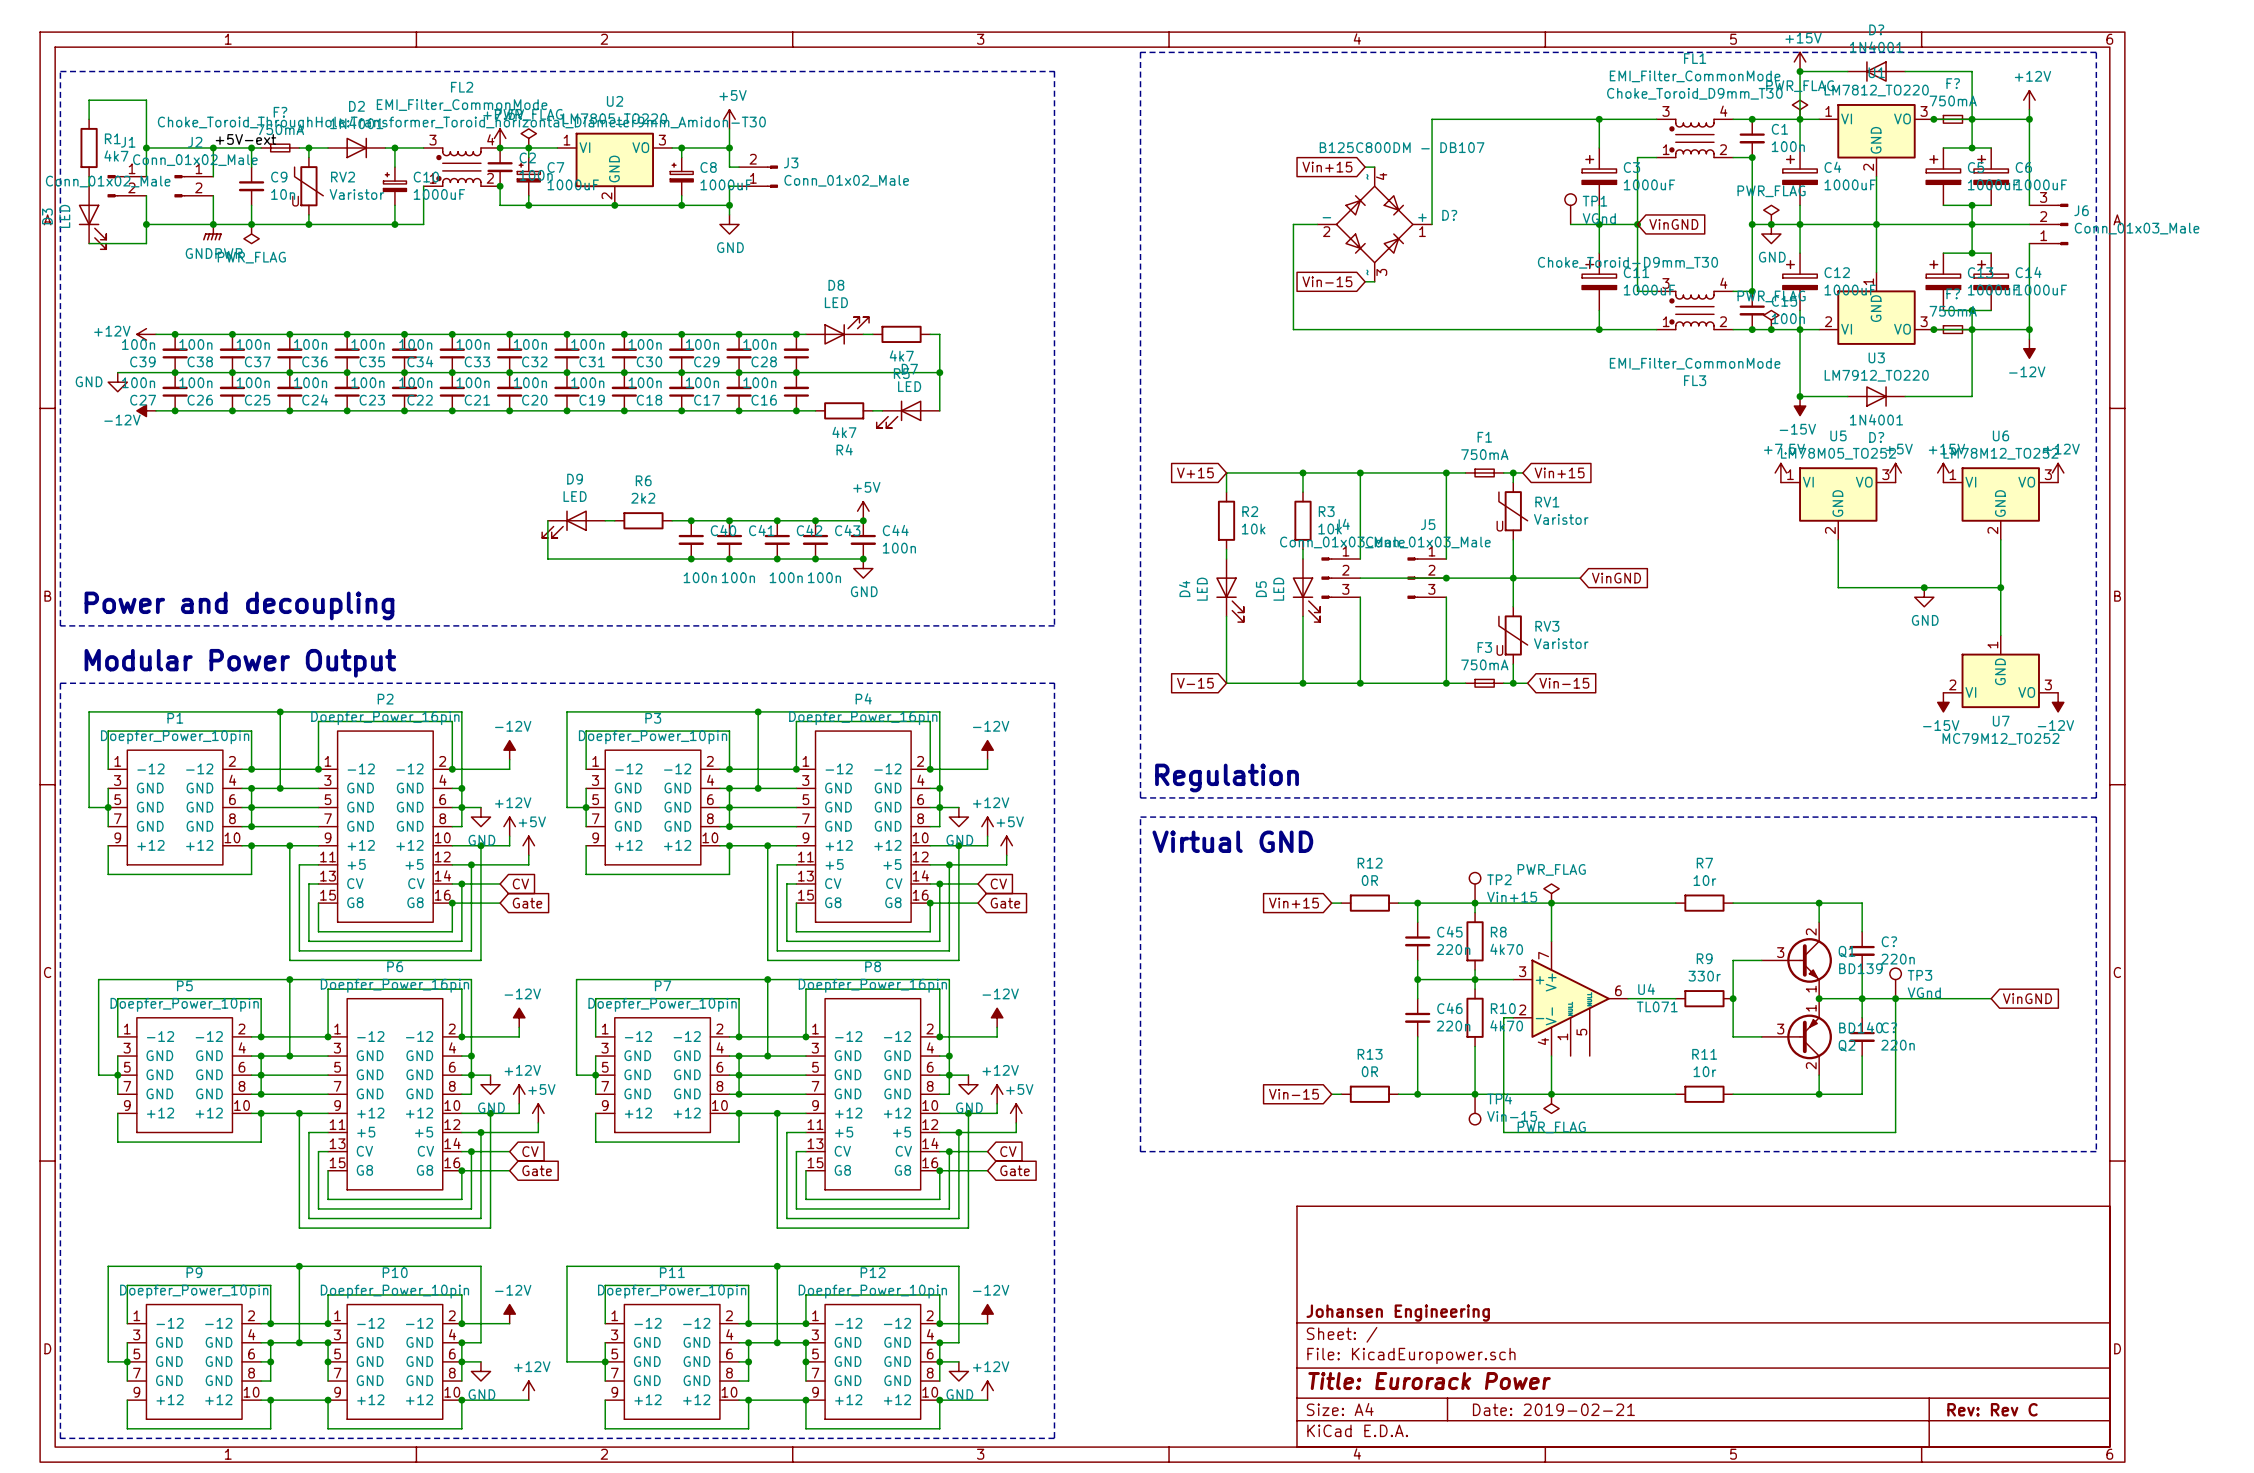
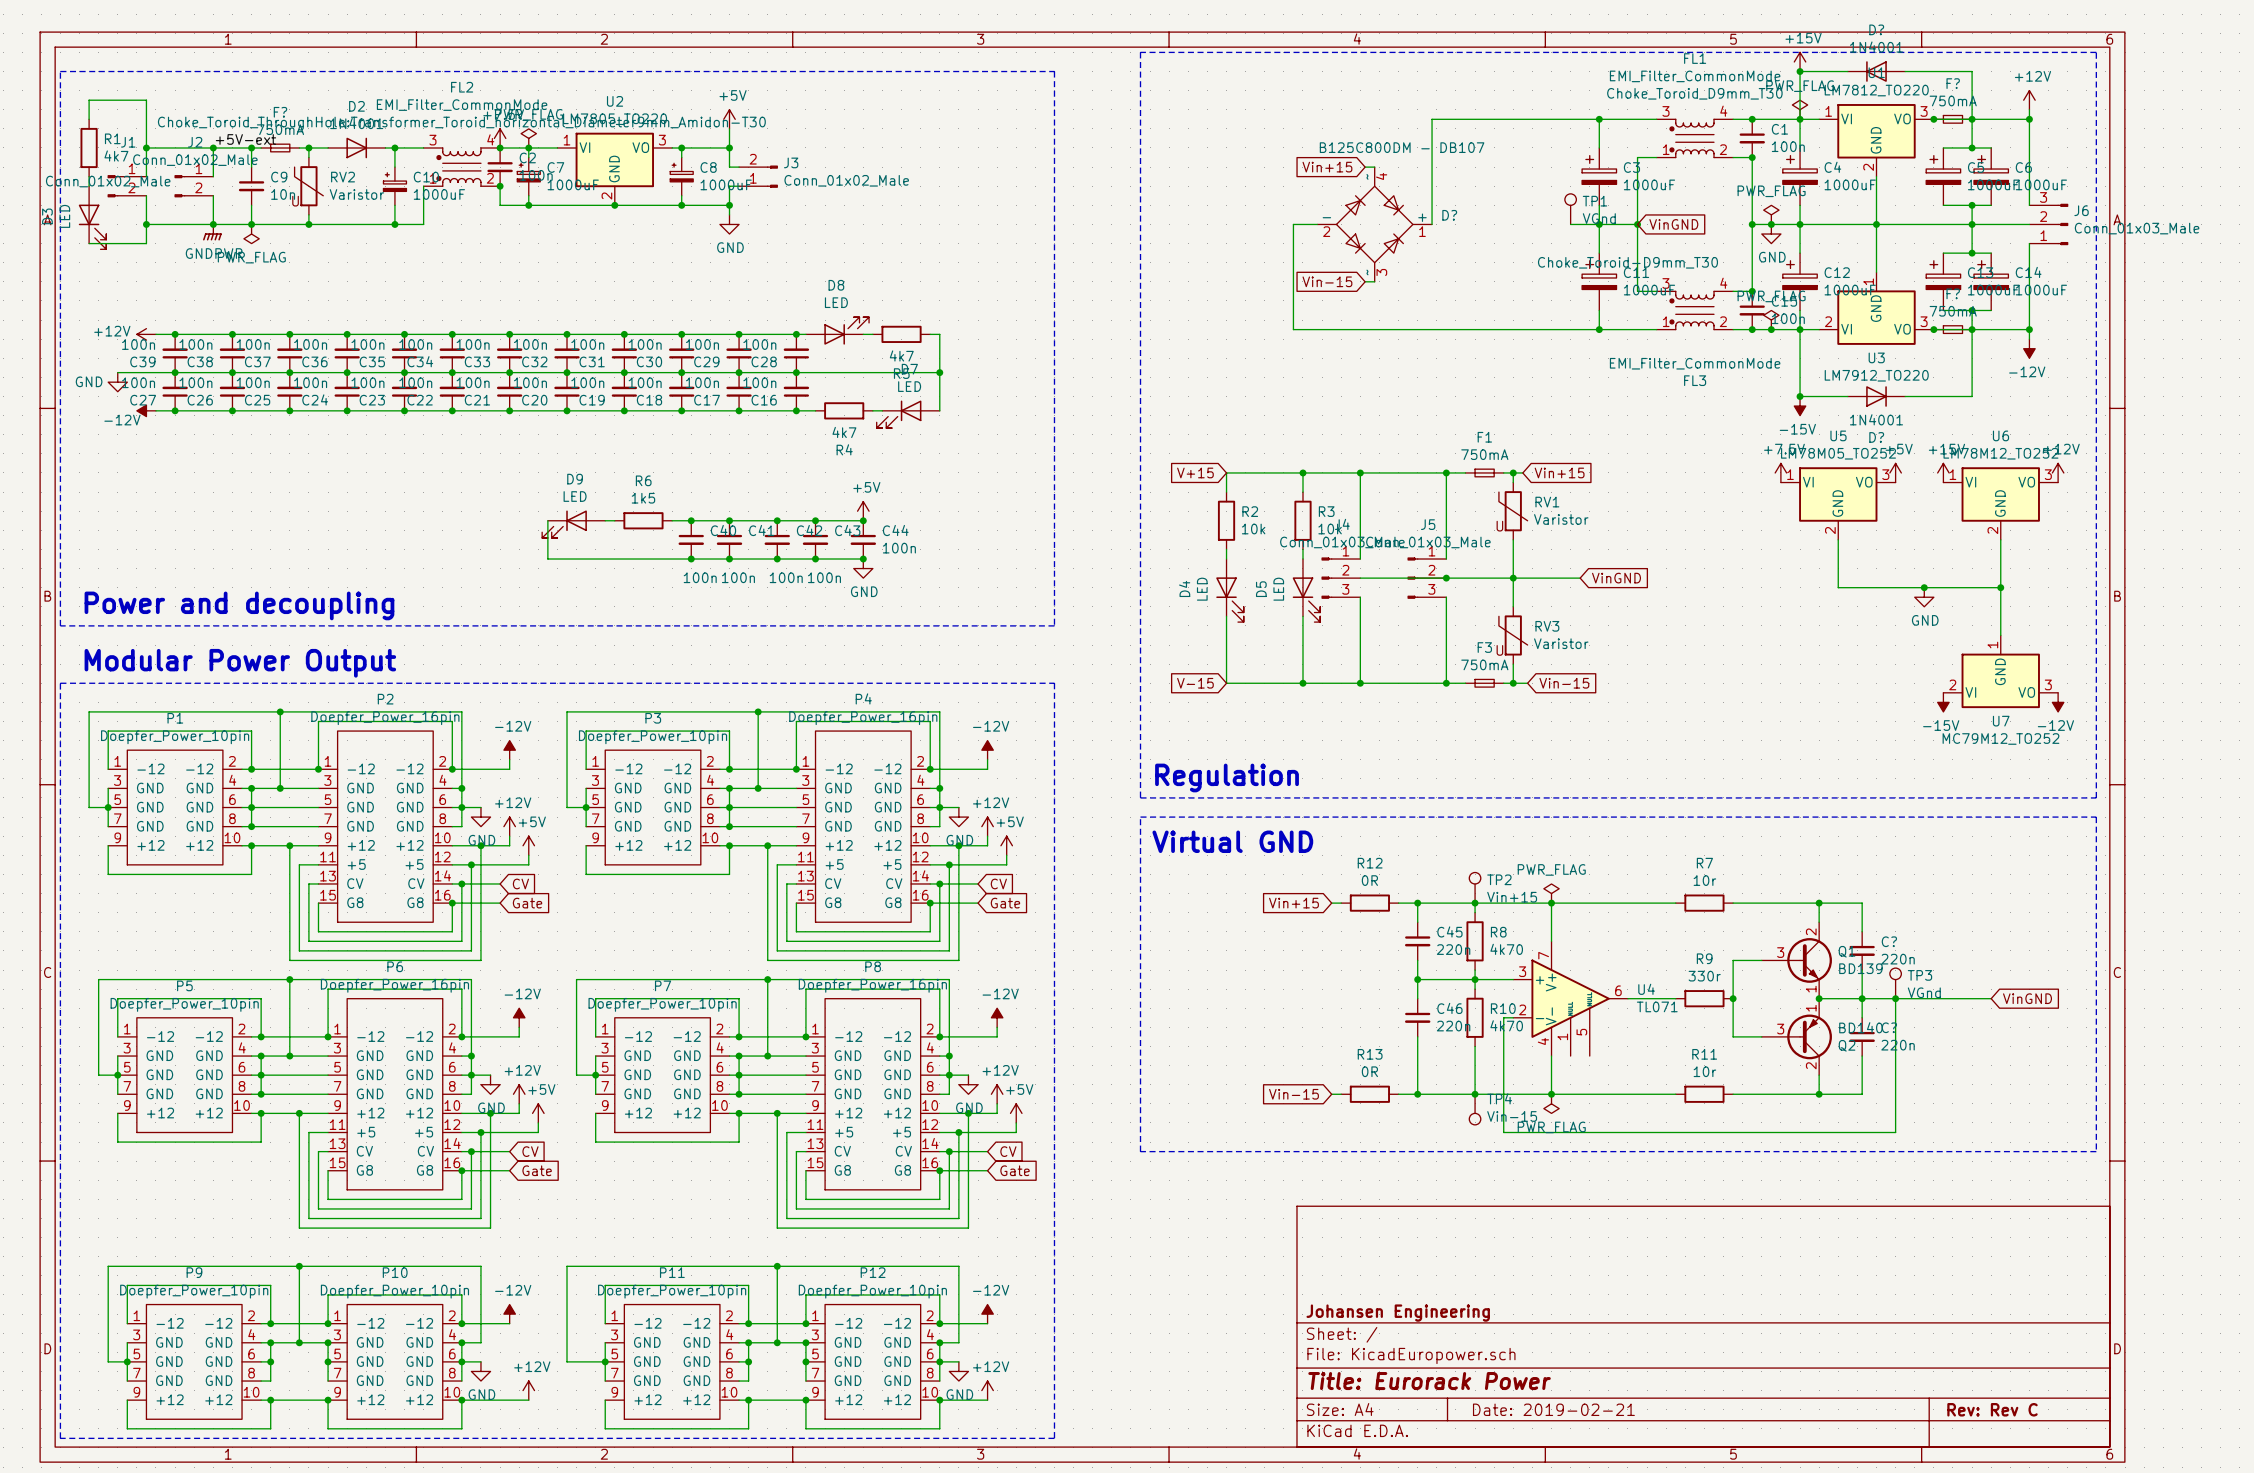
R6 value: 2k2 (643, 498) -> 1k5 (643, 498)

